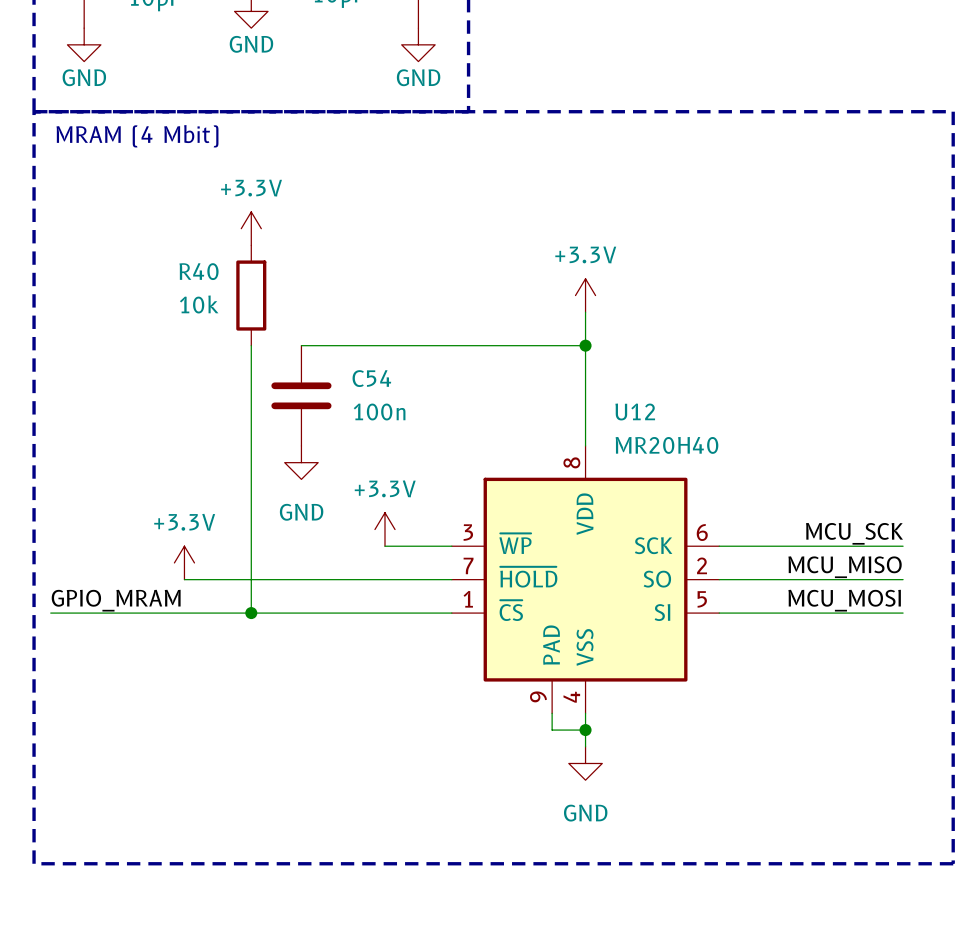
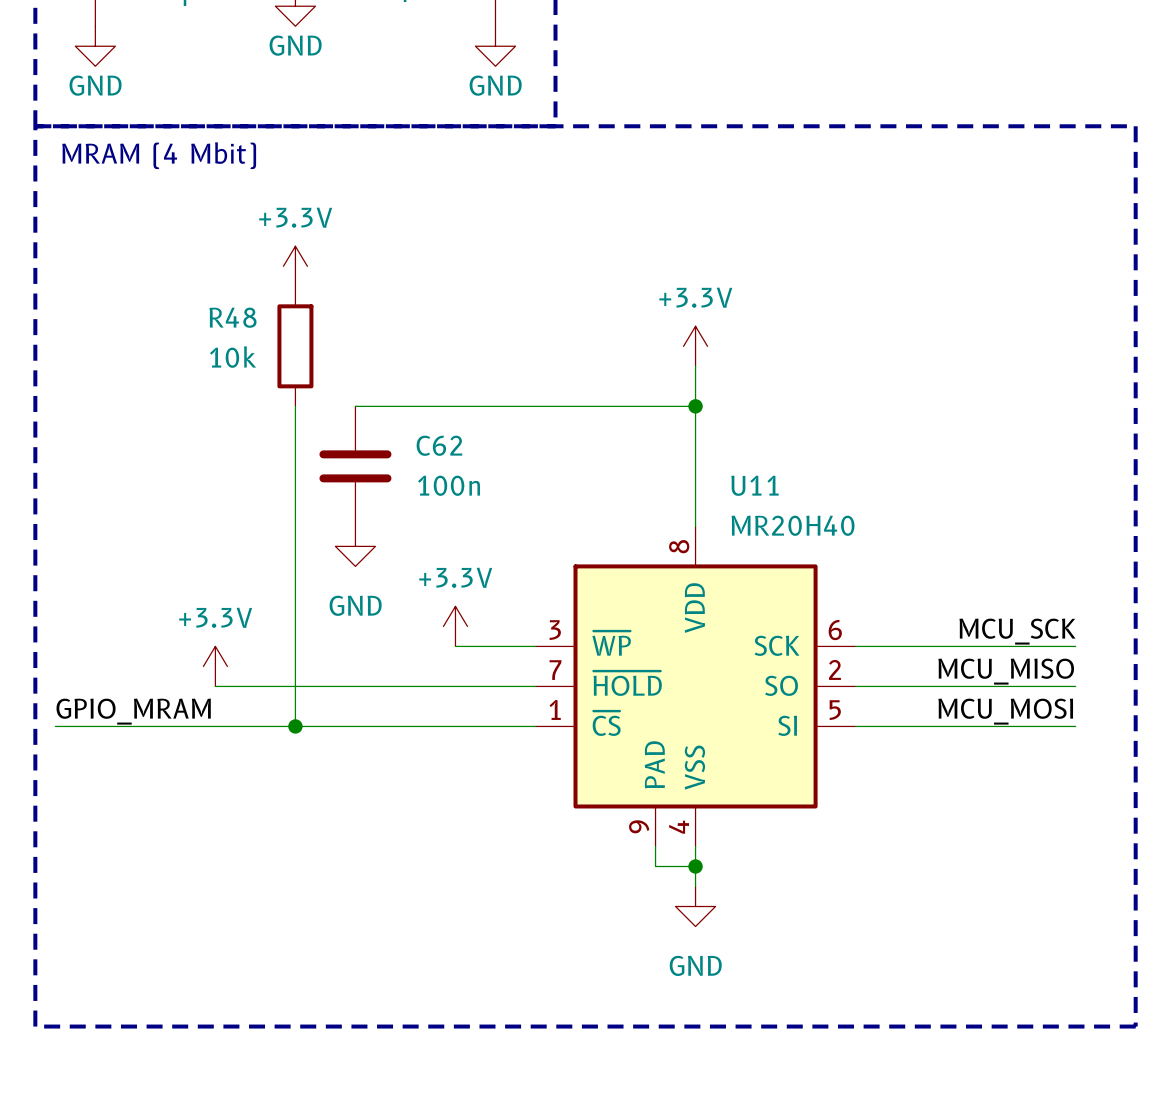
R40 name: R40 (199, 271) -> R48 (232, 317)
C54 name: C54 (371, 378) -> C62 (439, 445)
U12 name: U12 (635, 411) -> U11 (754, 485)

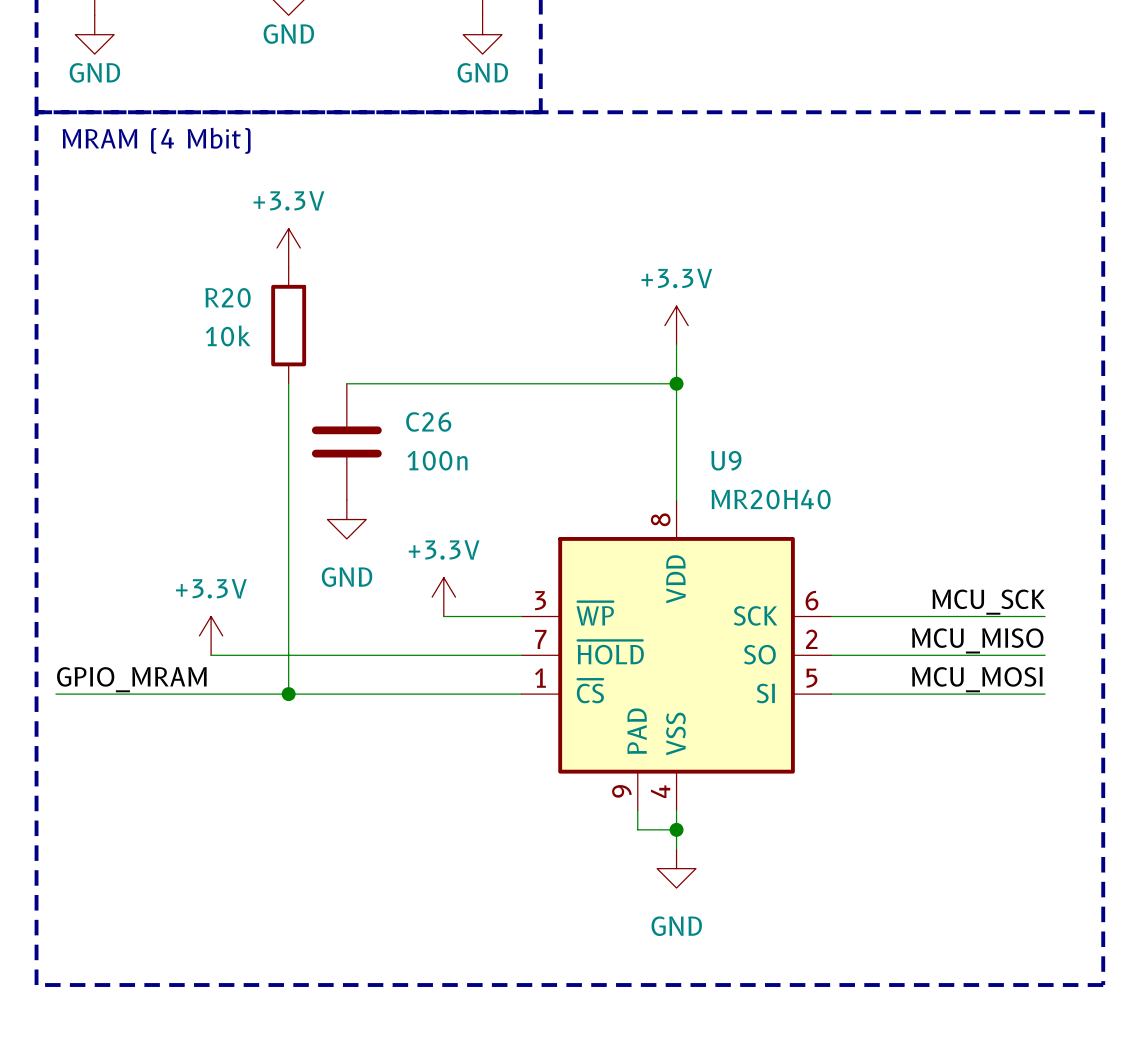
R48 name: R48 (232, 317) -> R20 (227, 297)
C62 name: C62 (439, 445) -> C26 (428, 421)
U11 name: U11 (754, 485) -> U9 (726, 460)

